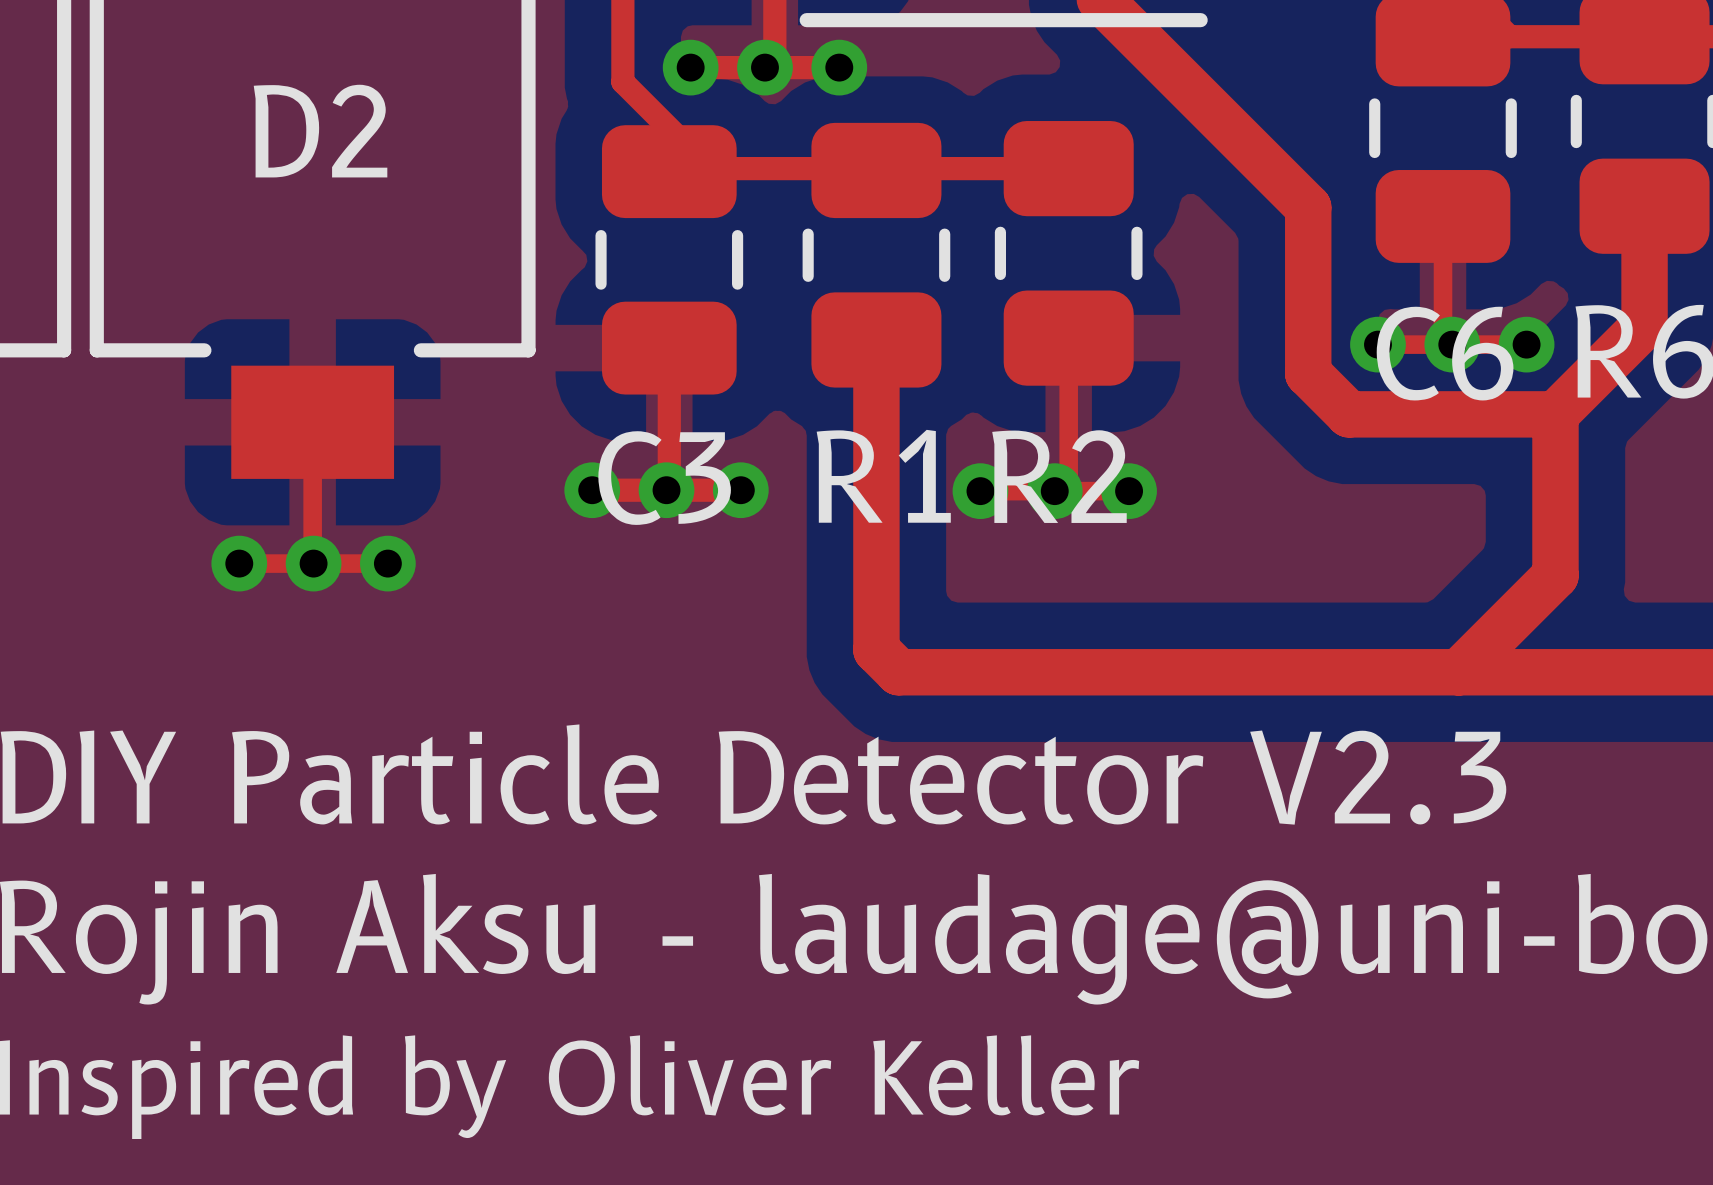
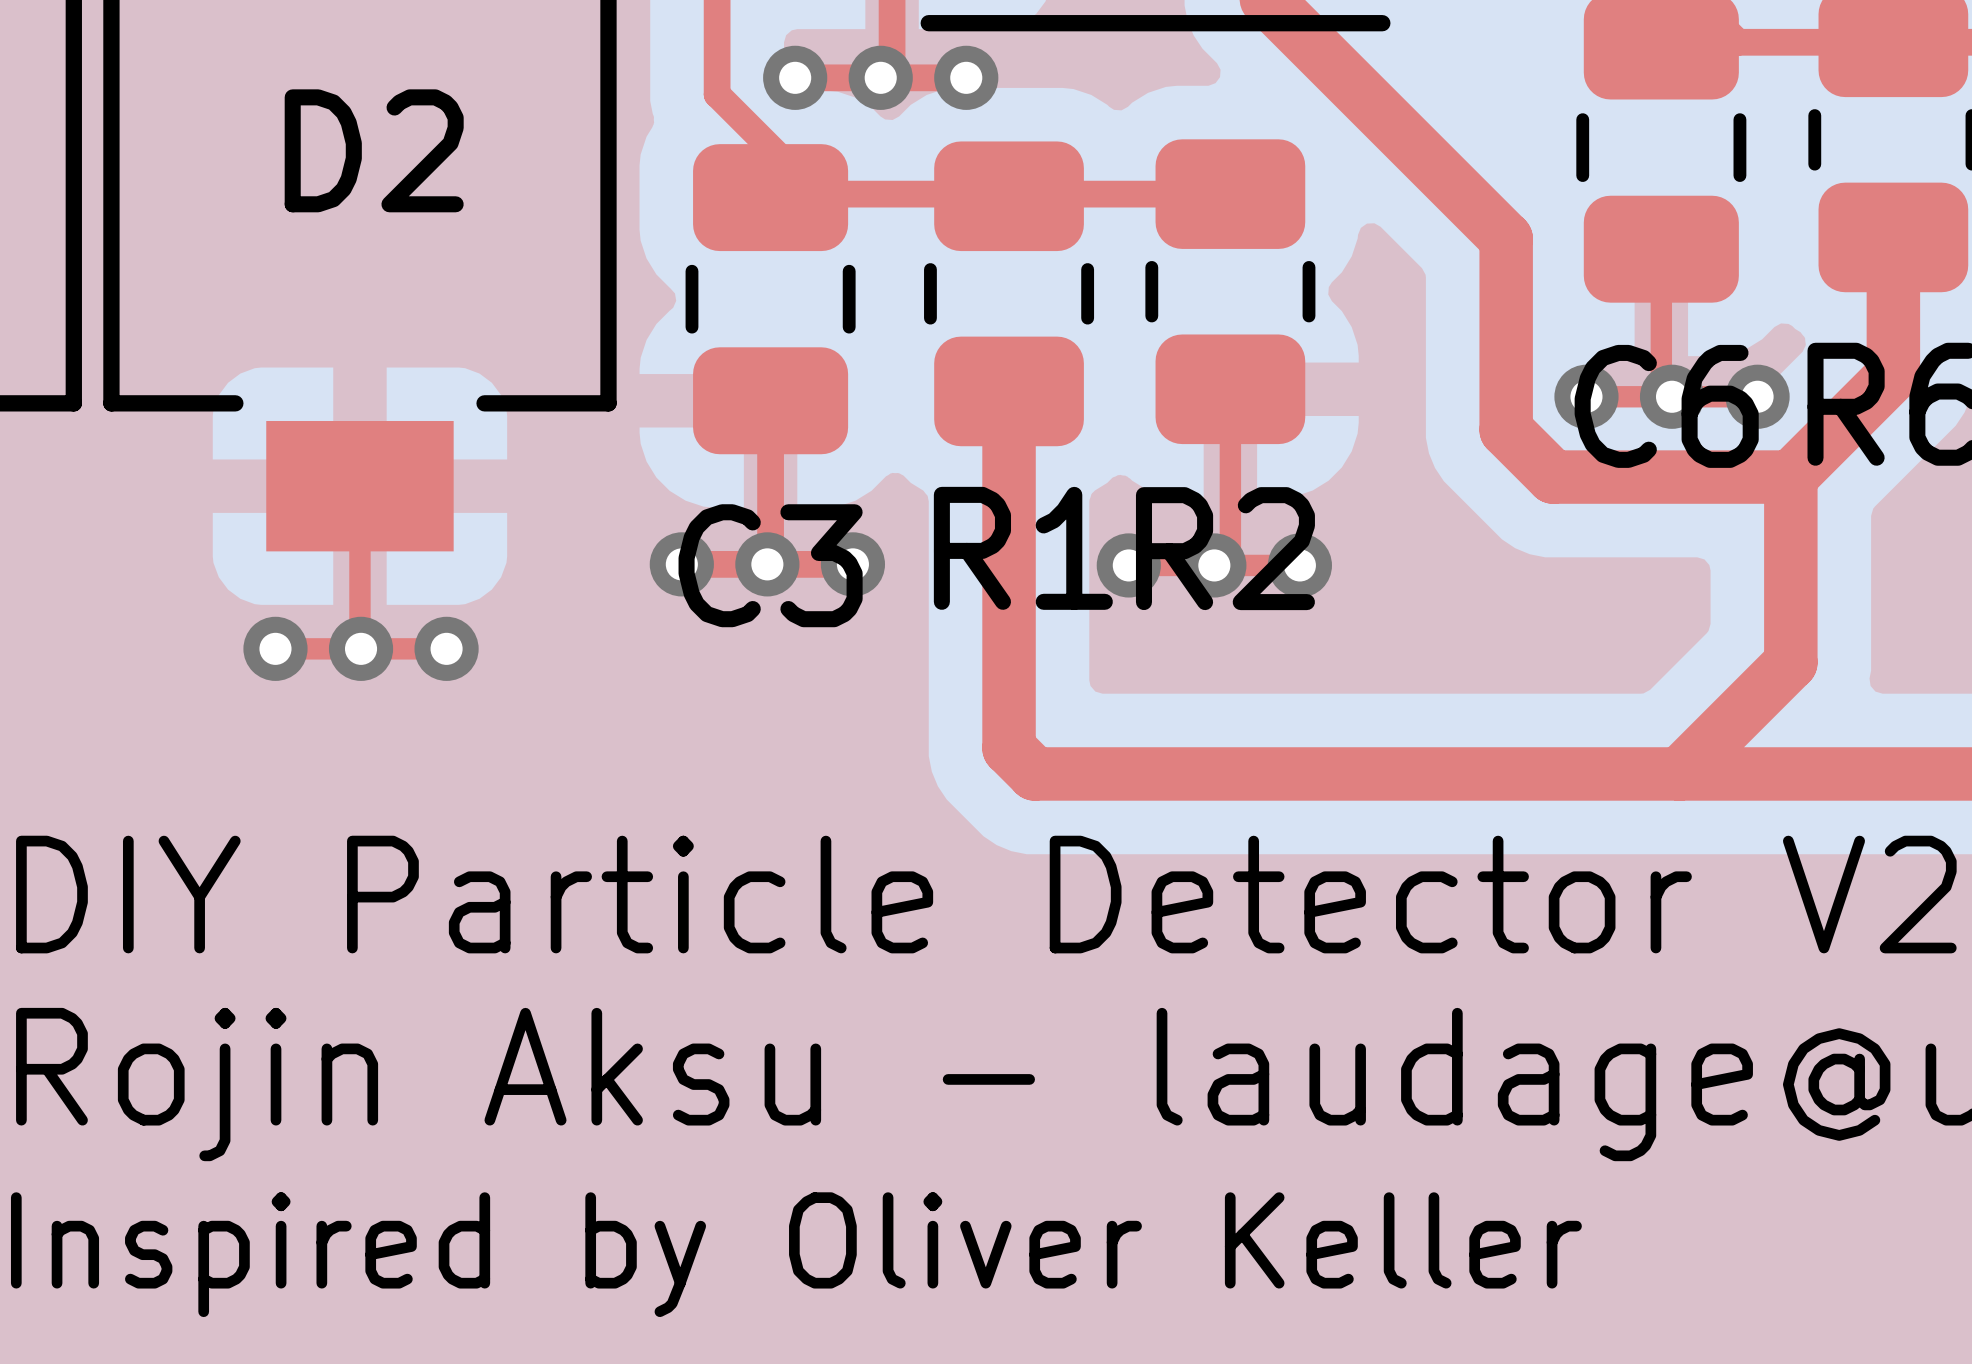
C3 name position: C3 (664, 478) -> C3 (770, 565)

